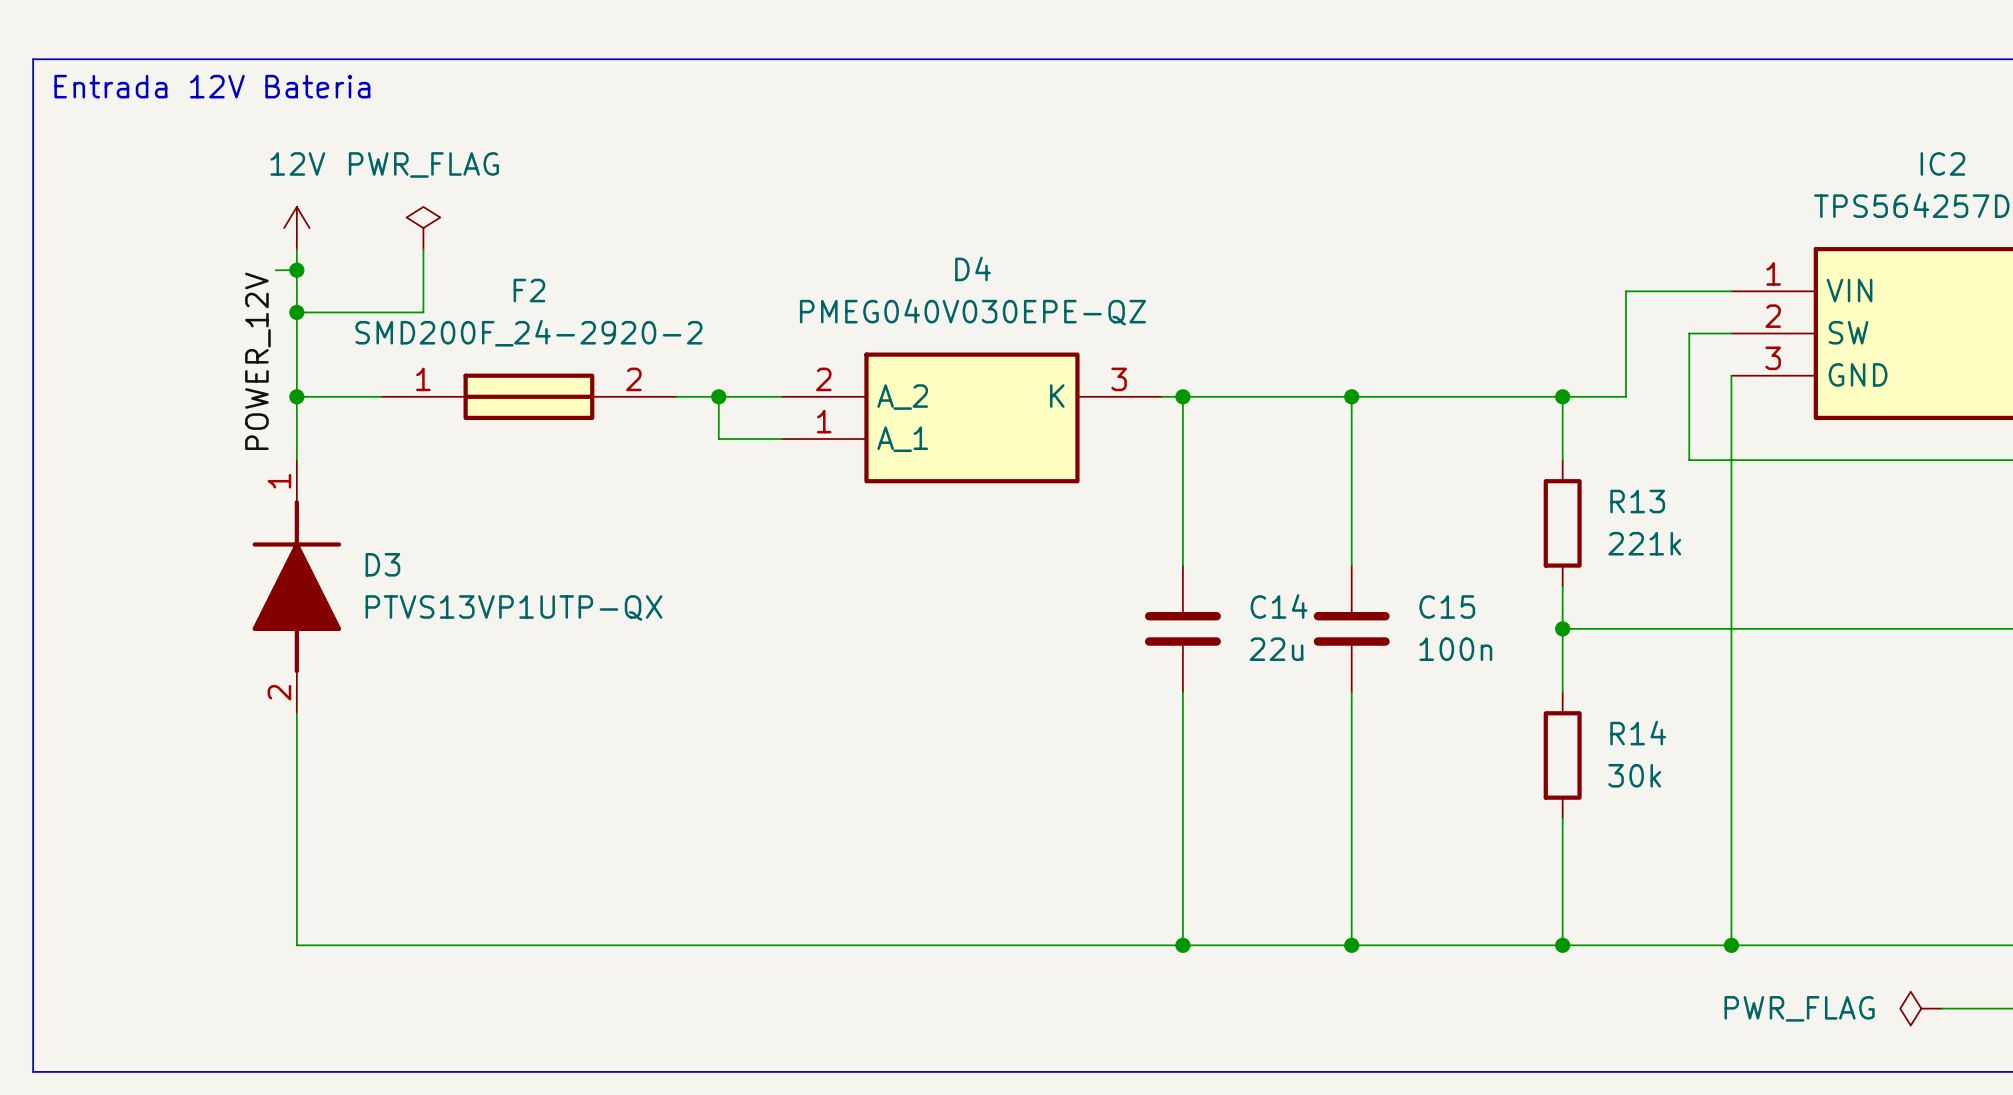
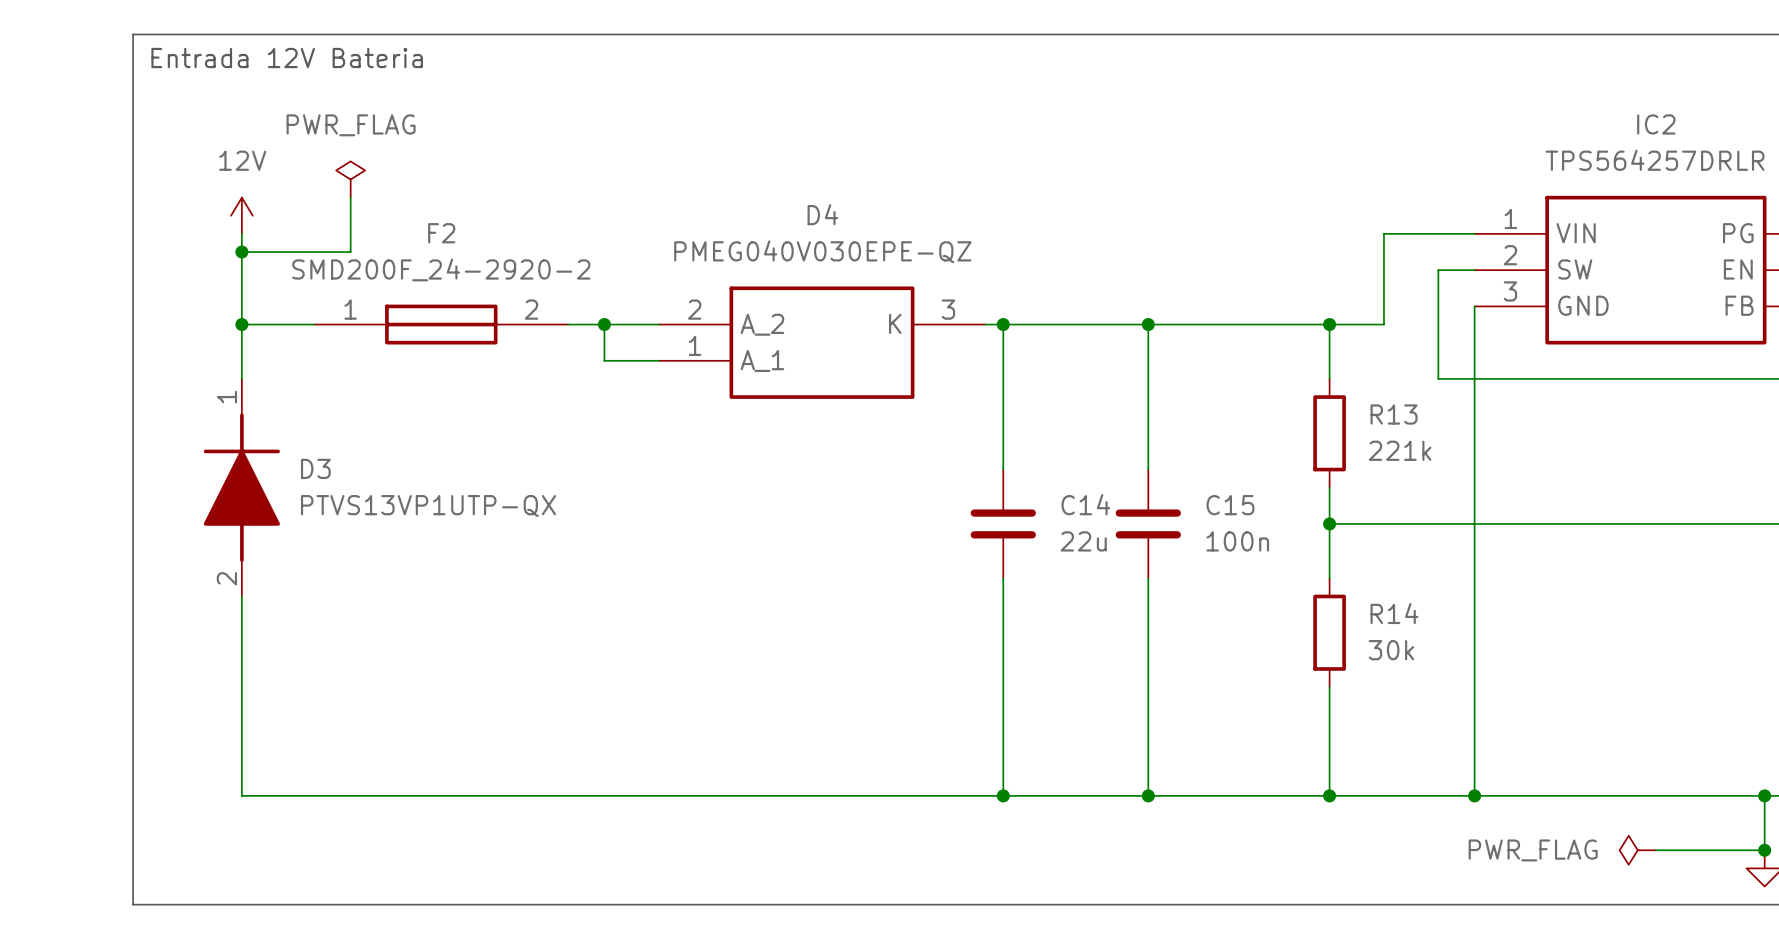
line: (170, 59) (33, 59) (33, 1071) (170, 1071) -> (133, 34) (133, 904)
text position: Entrada 12V Bateria (212, 86) -> Entrada 12V Bateria (287, 58)
power symbol position: 12V (296, 228) -> 12V (241, 215)
wire: (275, 270) (296, 270) -> none
junction: (296, 270) -> none
label: POWER_12V (257, 361) -> none

